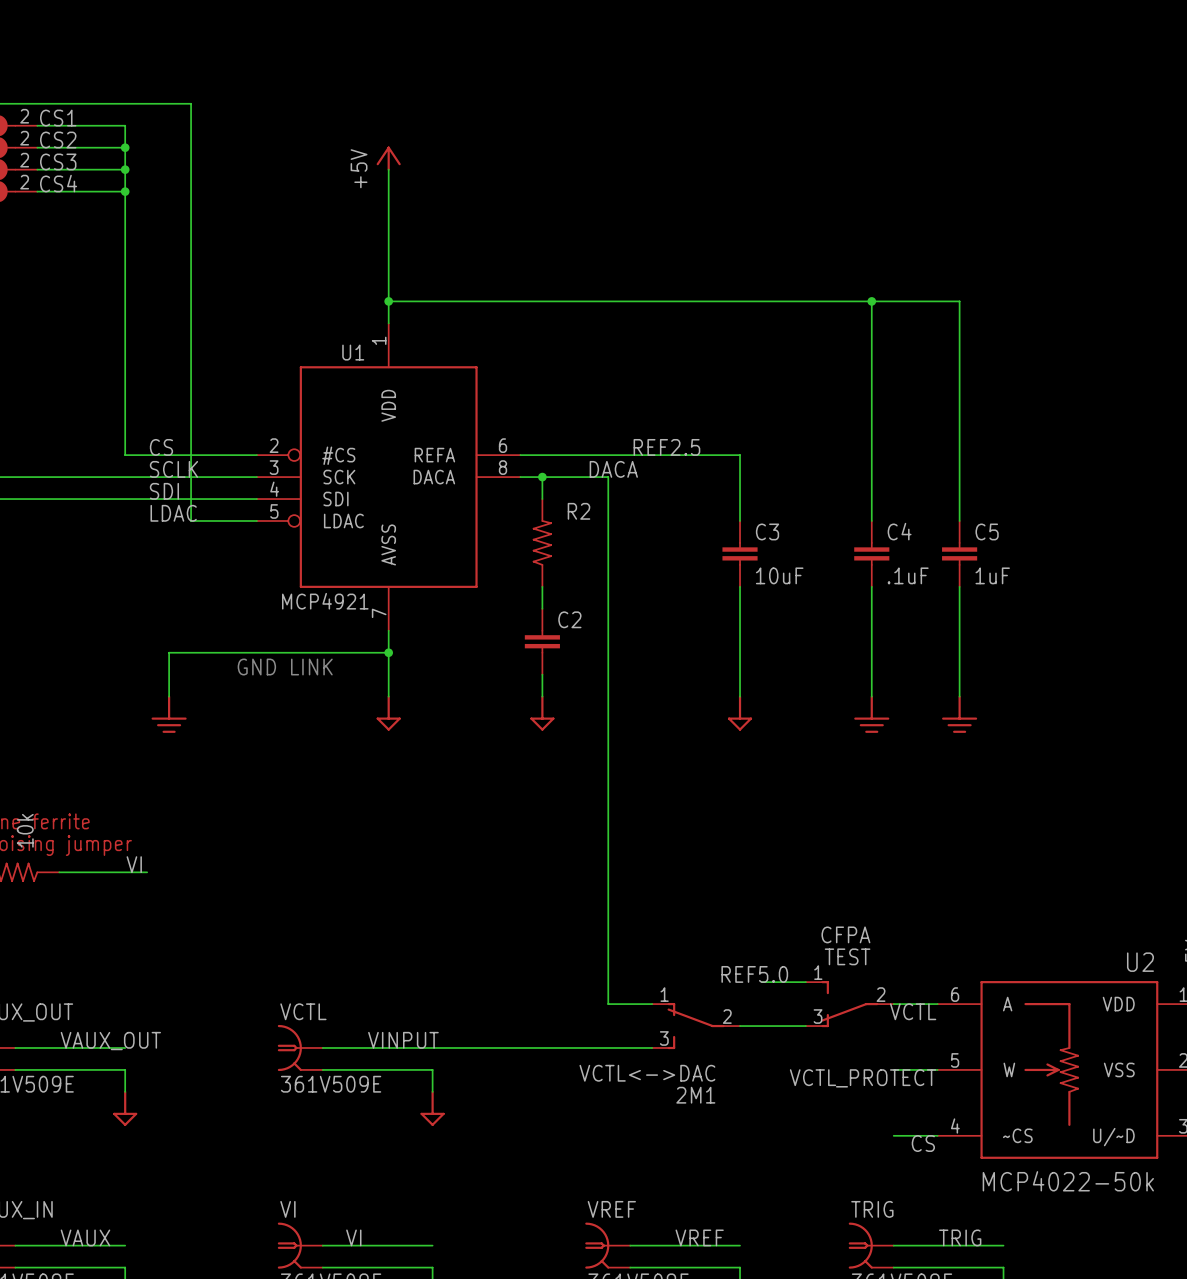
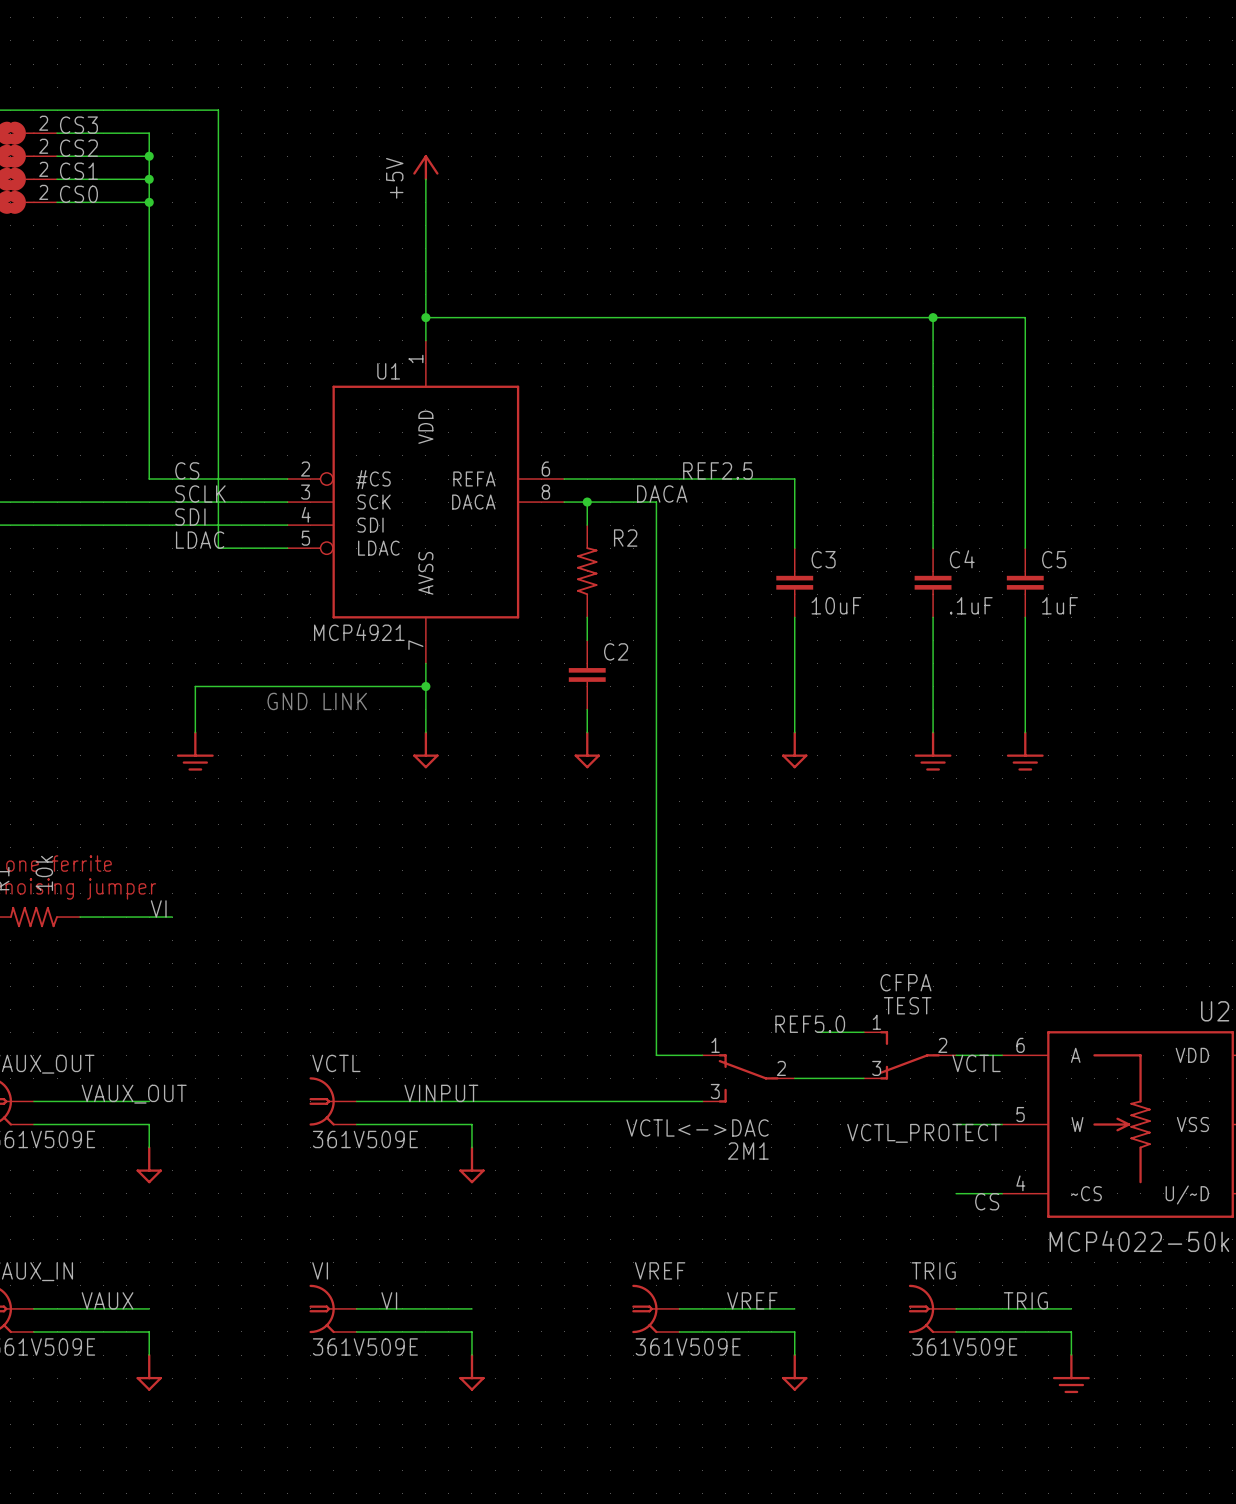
CS1 name: CS1 (58, 118) -> CS3 (78, 125)
CS3 name: CS3 (58, 161) -> CS1 (78, 171)
CS4 name: CS4 (58, 183) -> CS0 (78, 194)

